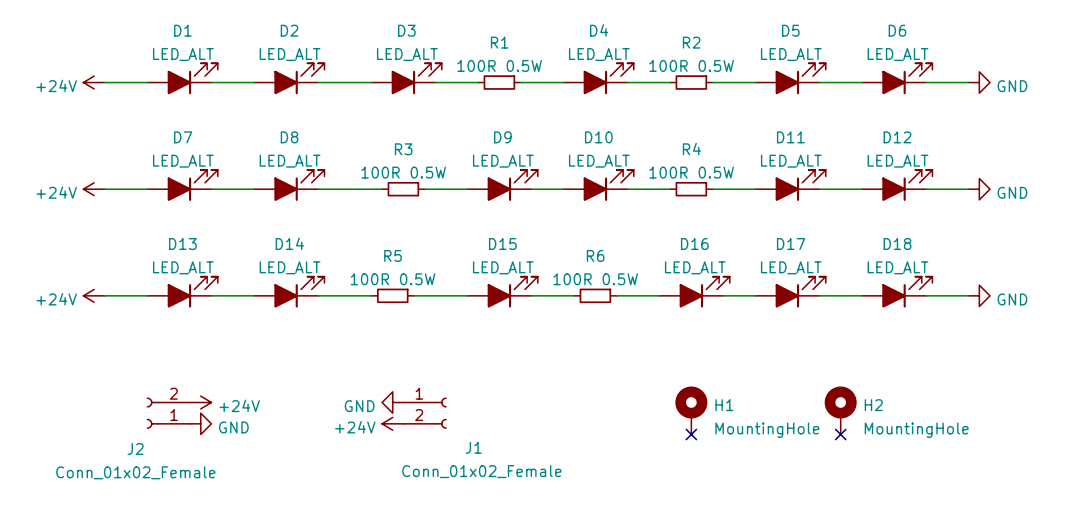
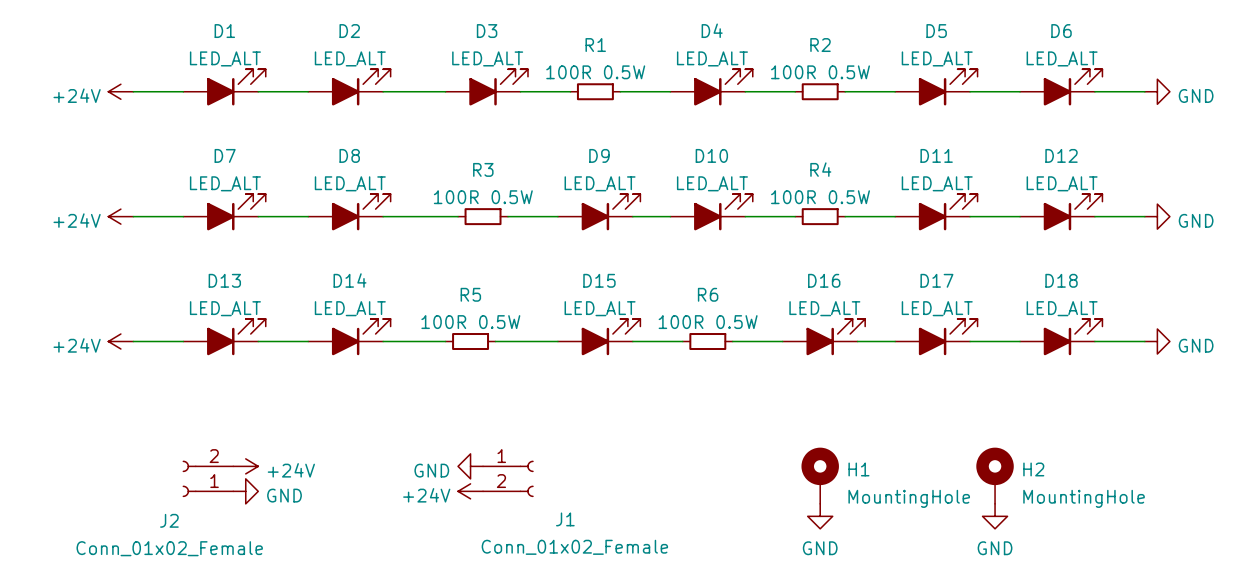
no-connect mark: (691, 434) -> none
no-connect mark: (840, 434) -> none
power symbol: none -> GND (820, 516)
power symbol: none -> GND (995, 516)

